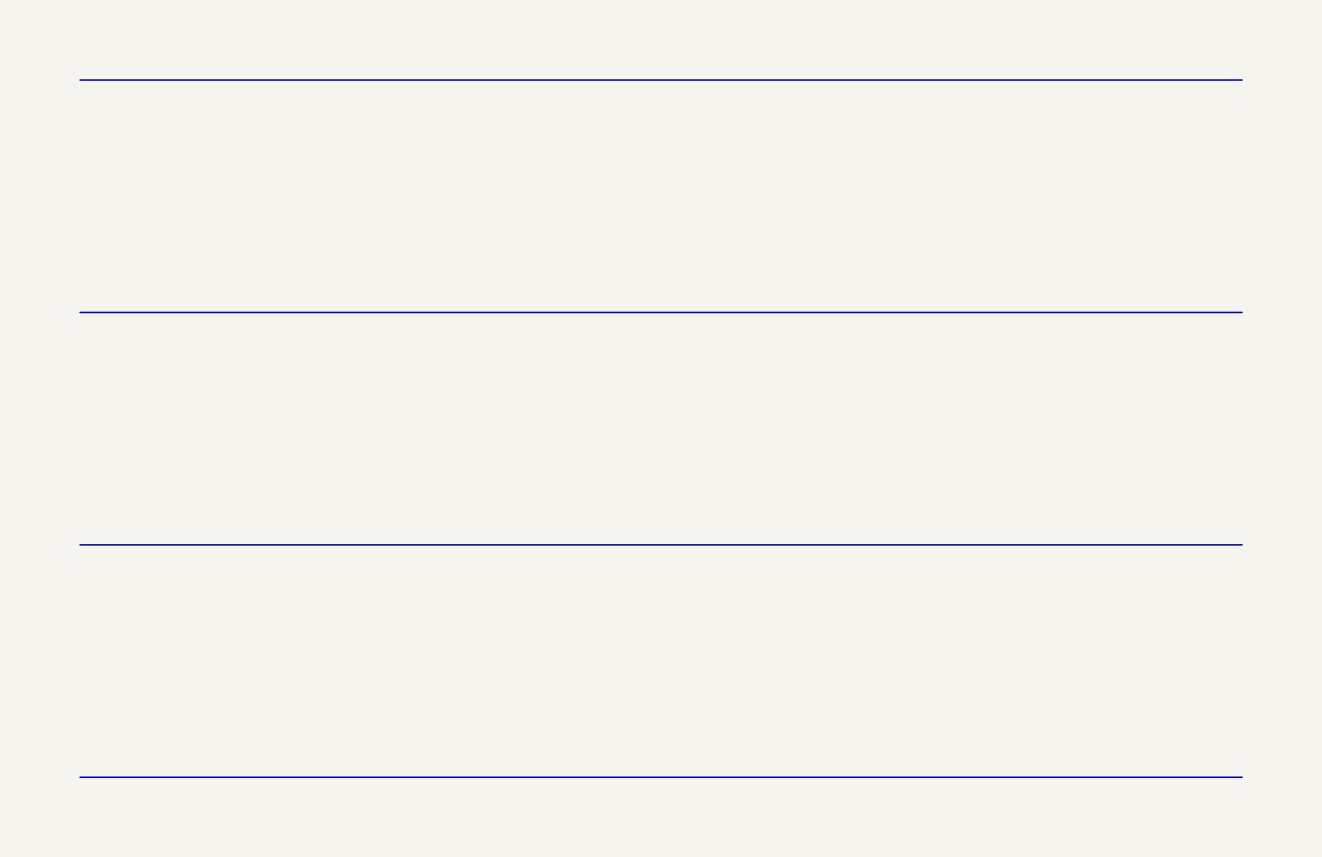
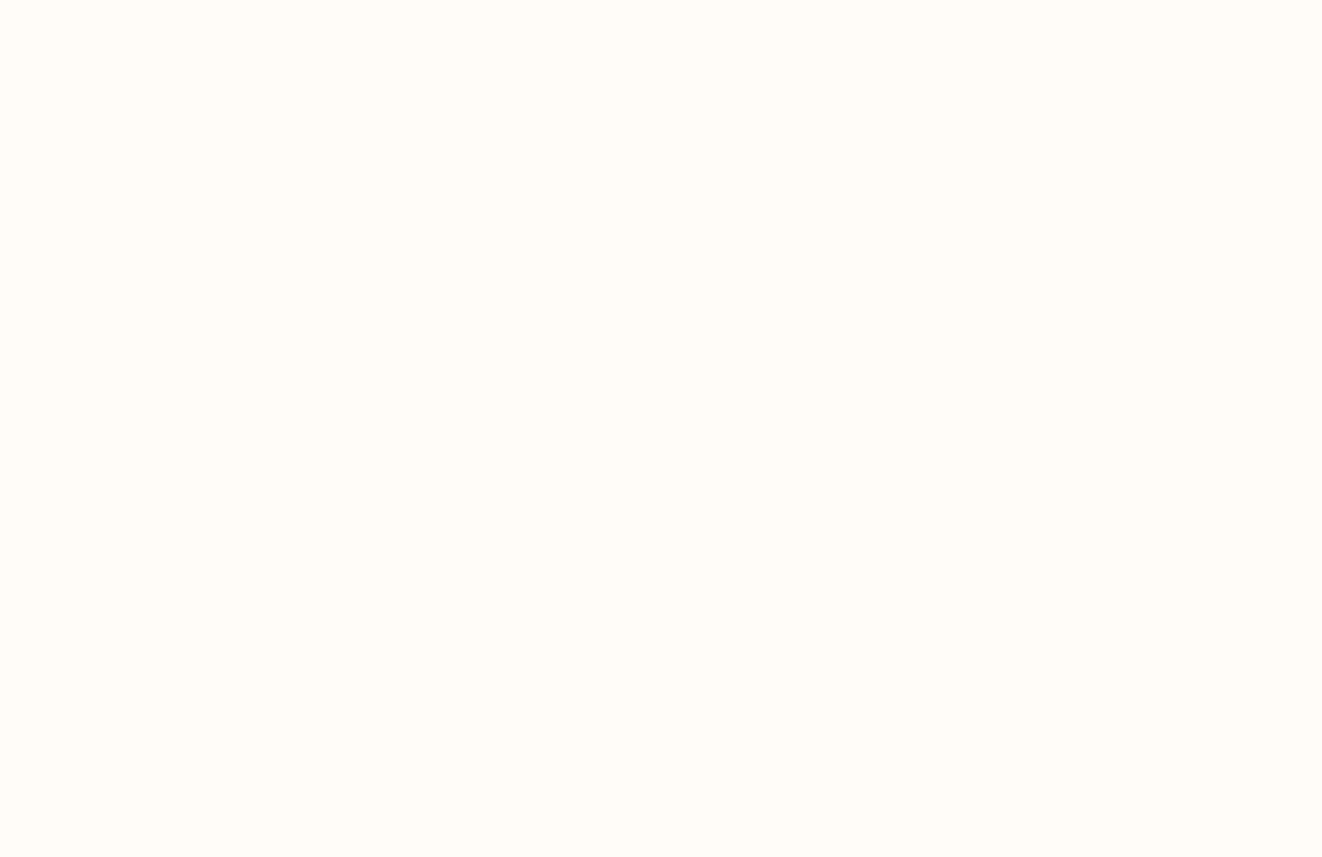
line: (80, 80) (1242, 80) -> none
line: (80, 312) (1242, 312) -> none
line: (80, 544) (1242, 544) -> none
line: (80, 777) (1242, 777) -> none

